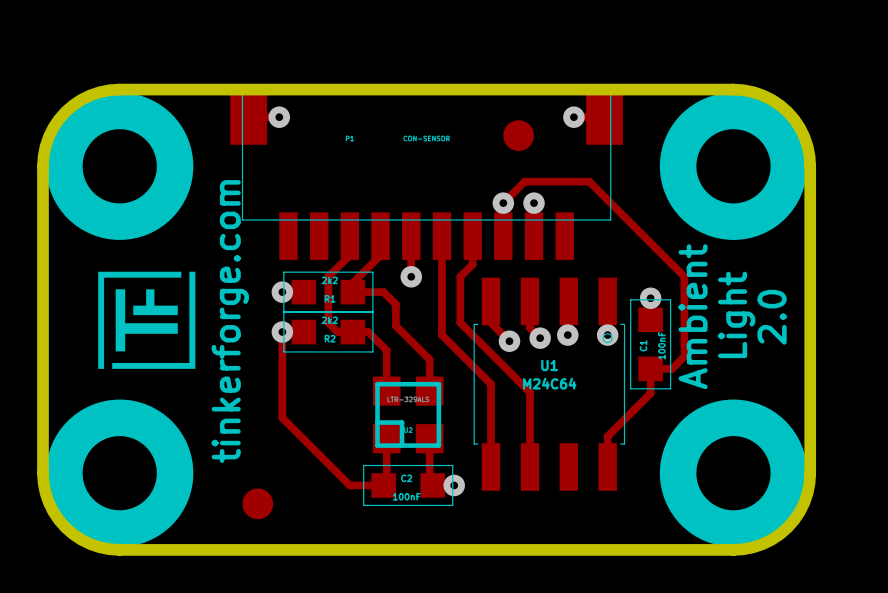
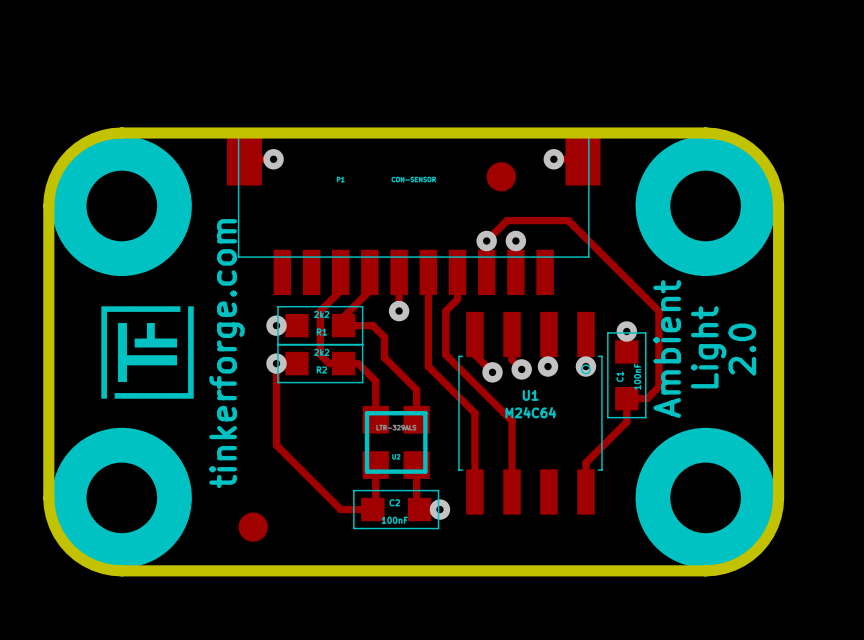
part footprint: [372, 376, 444, 454] -> [362, 405, 430, 479]

